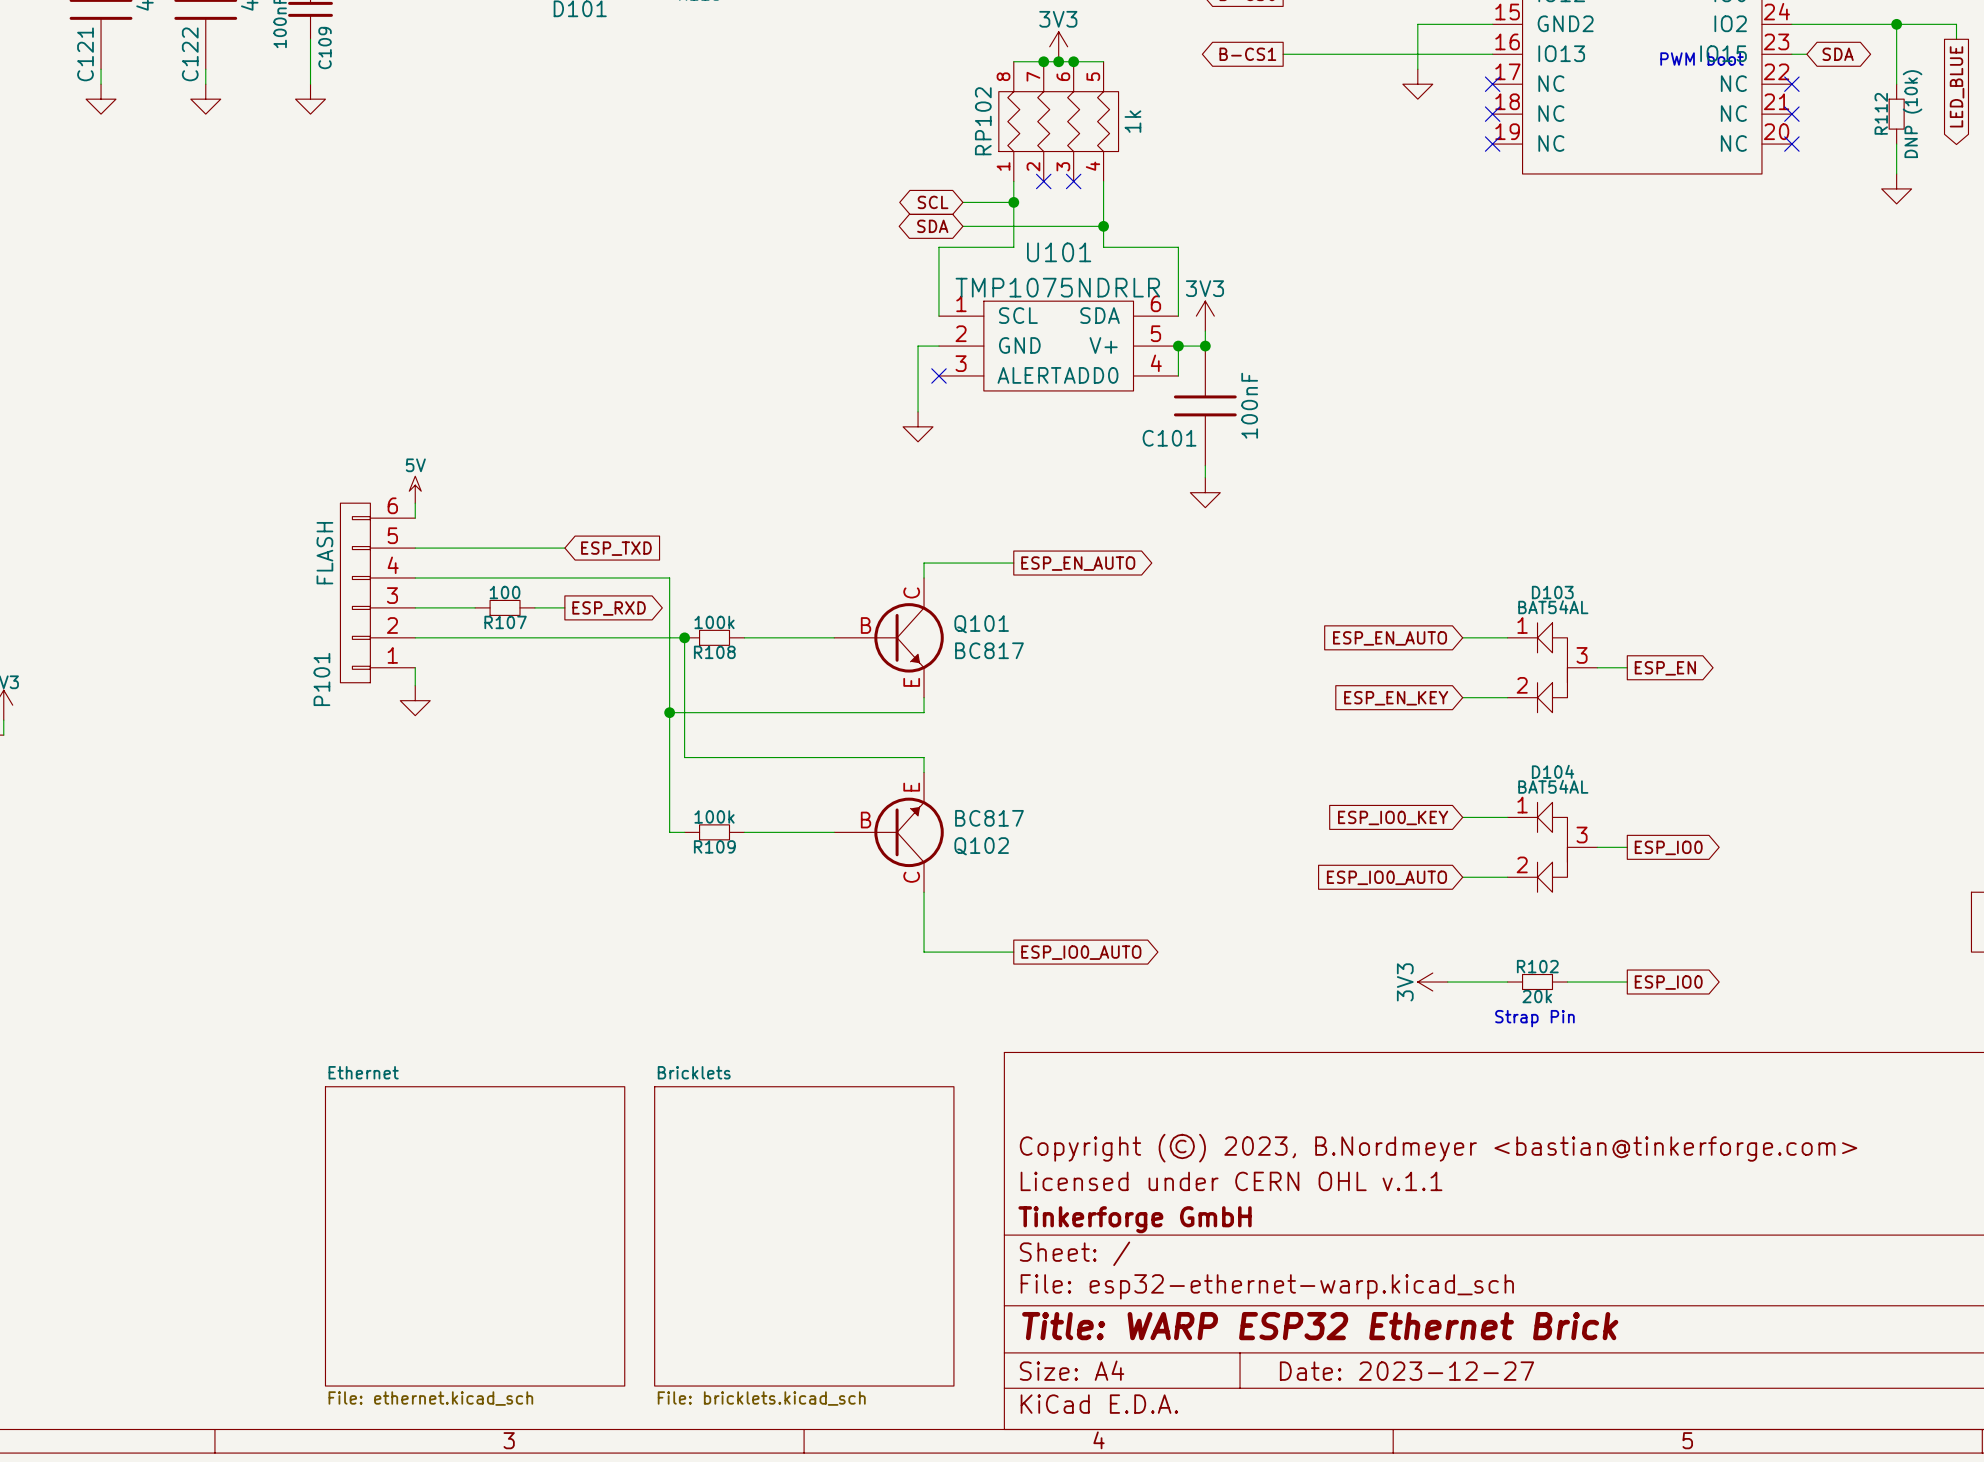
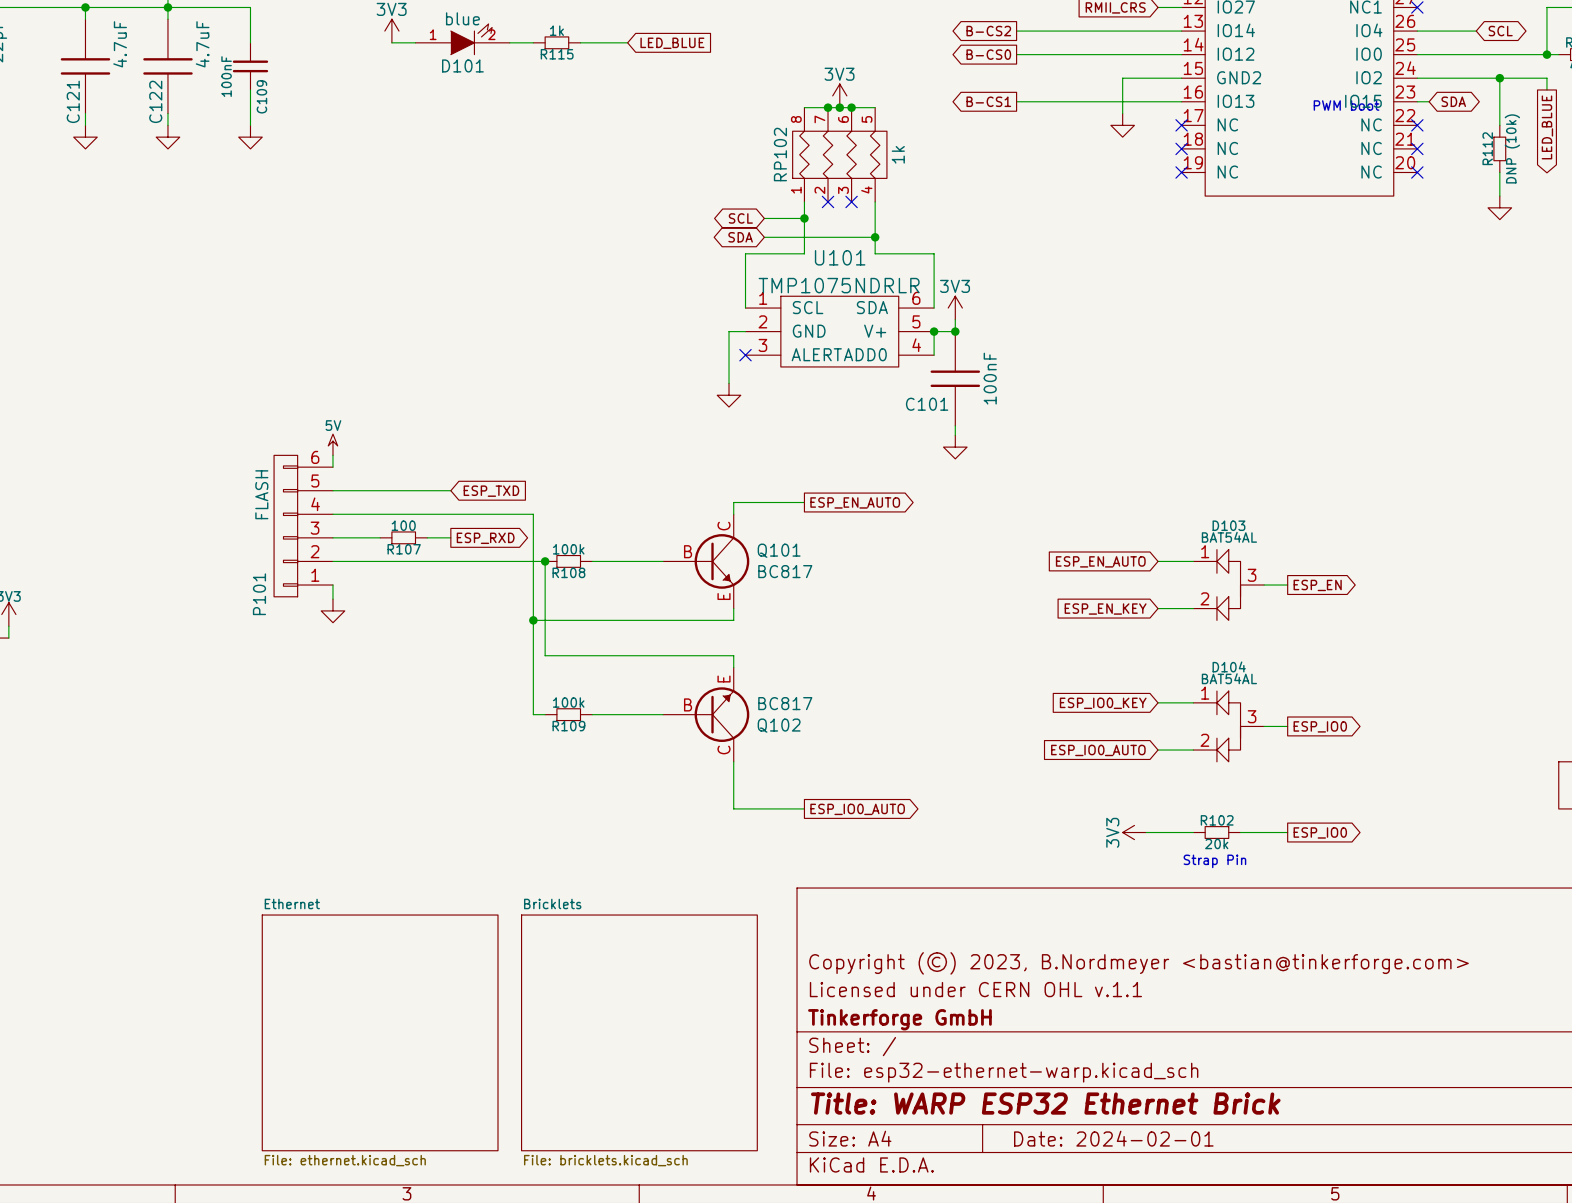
title block: Date: 2023-12-27 (1406, 1371) -> Date: 2024-02-01 (1113, 1138)

